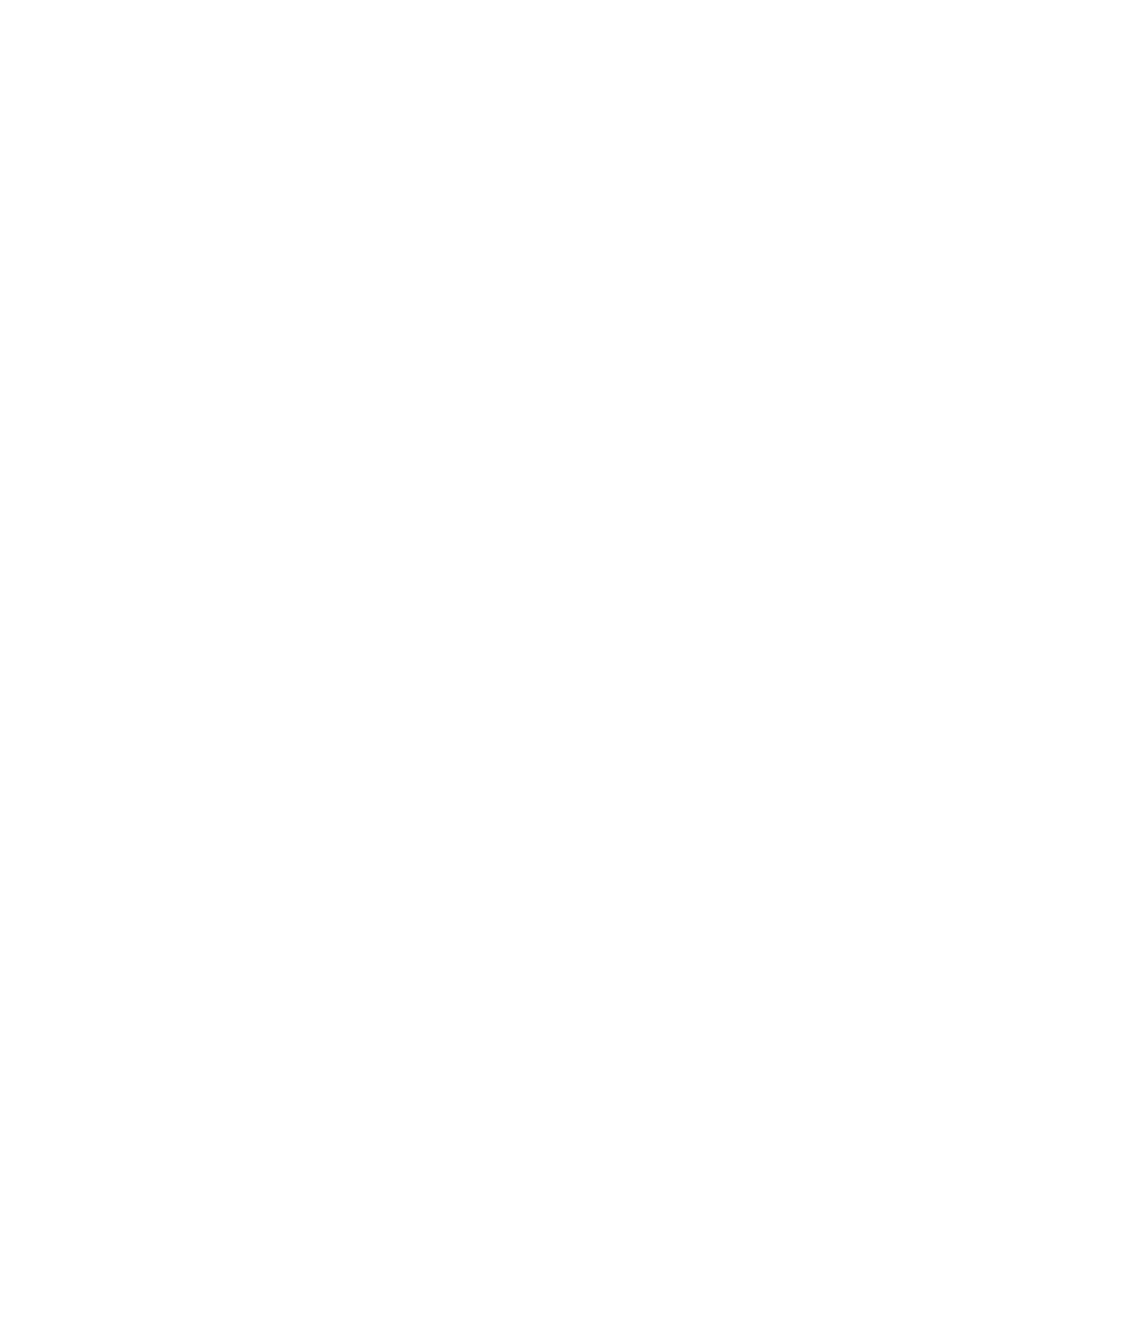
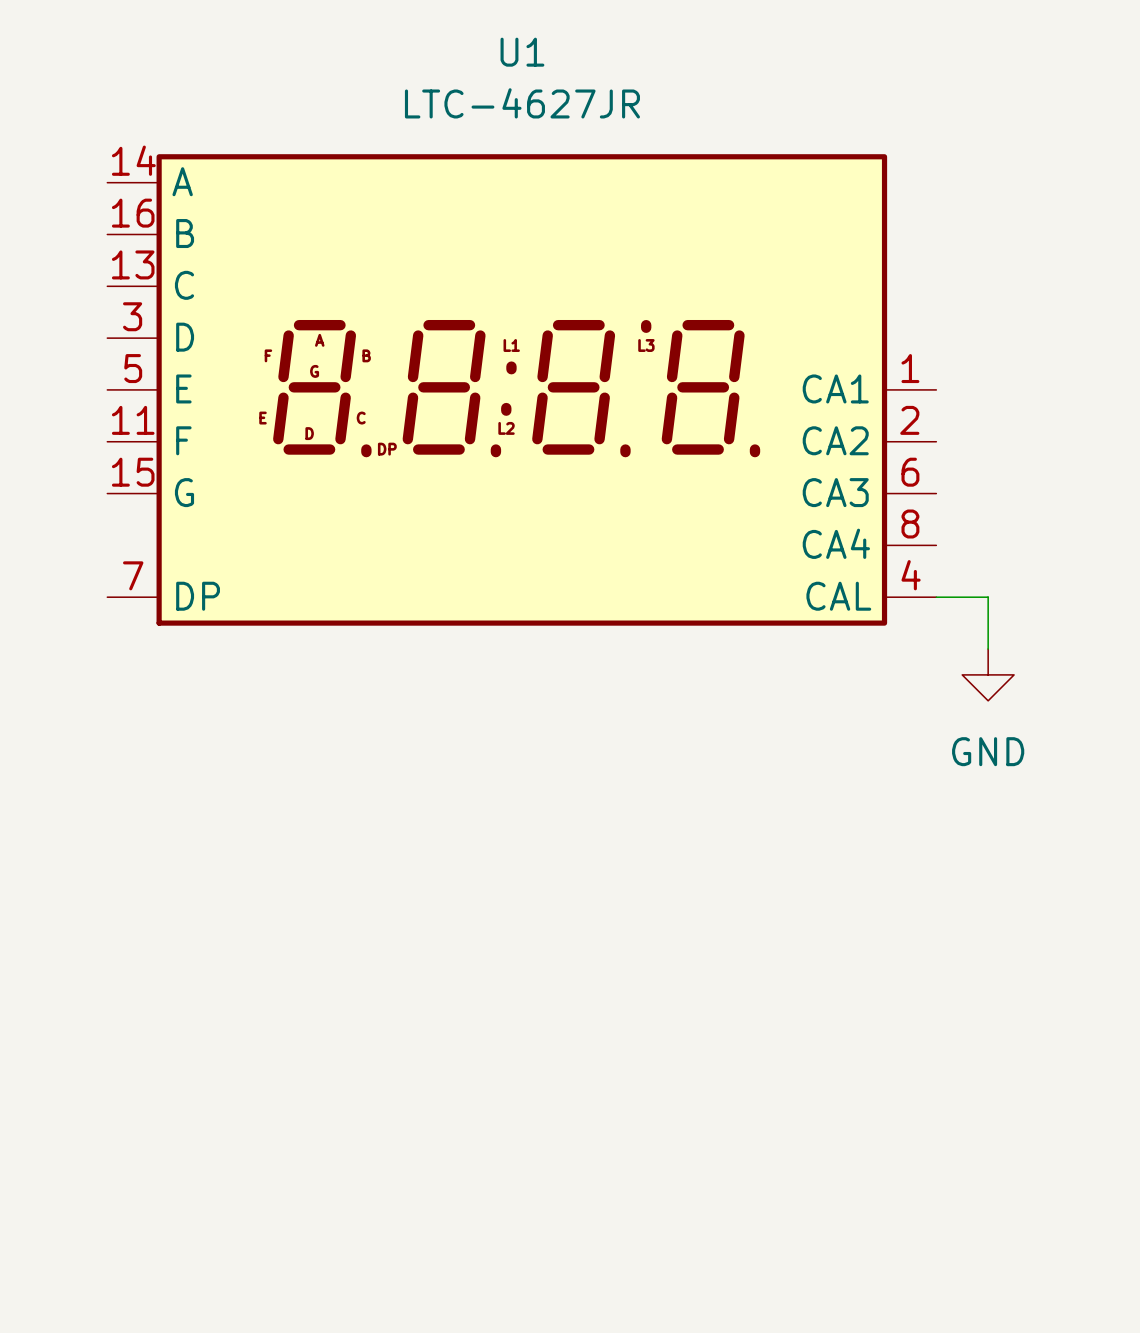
U1: none -> LTC-4627JR (521, 389)
wire: none -> (936, 597) (988, 597) (988, 649)
power symbol: none -> GND (988, 674)

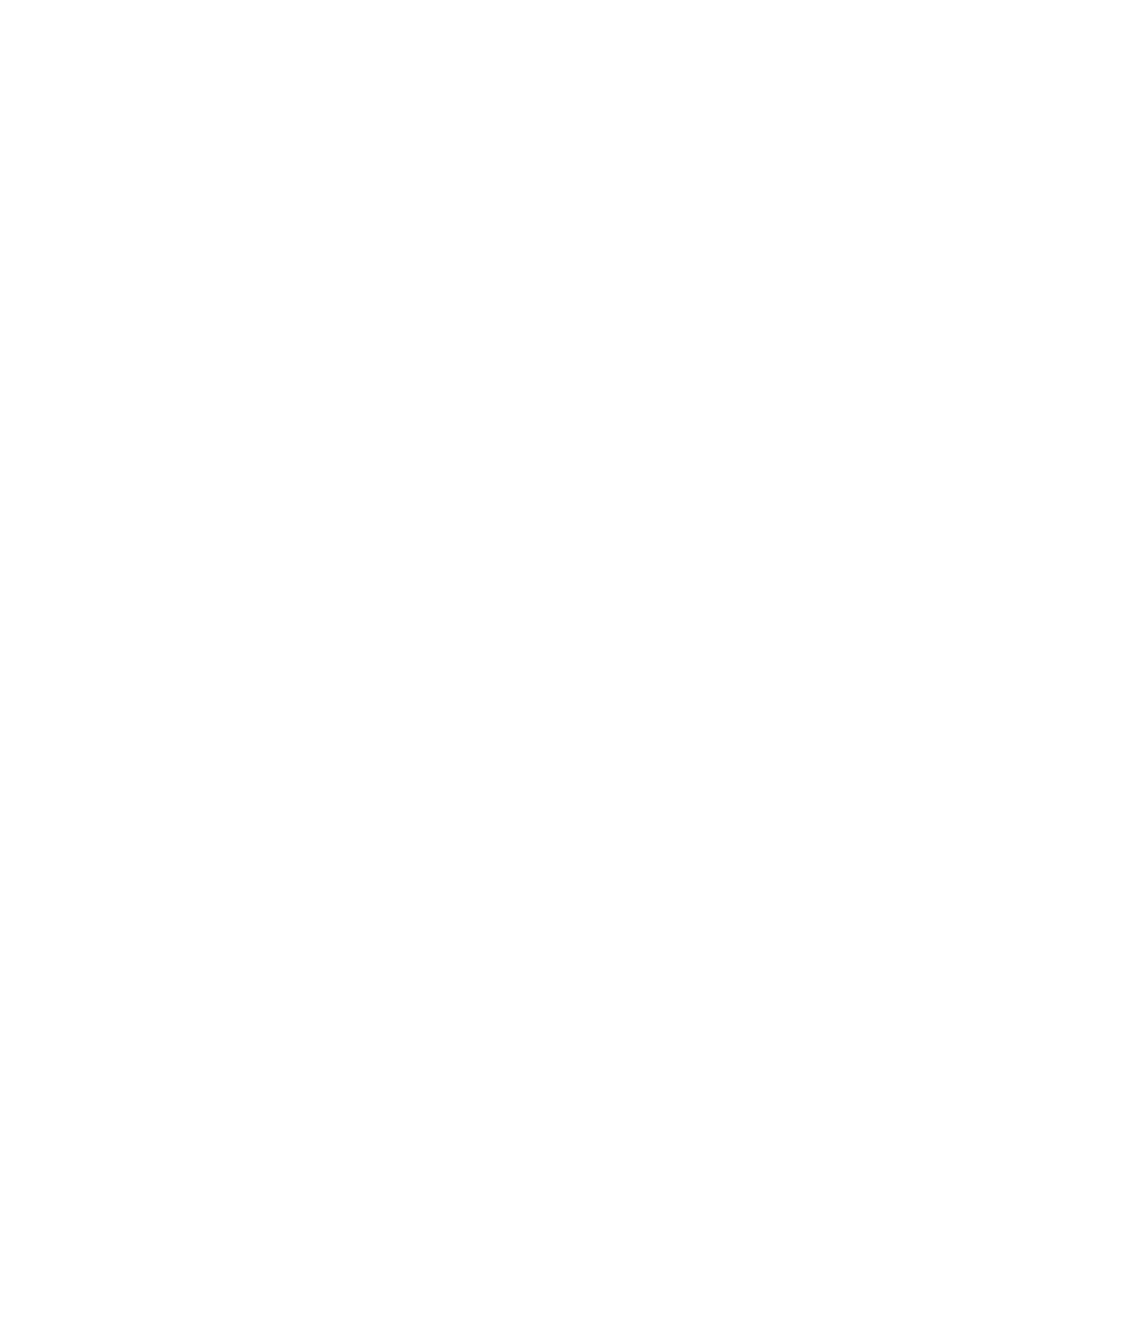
U1: LTC-4627JR (521, 389) -> none
wire: (936, 597) (988, 597) (988, 649) -> none
power symbol: GND (988, 674) -> none

